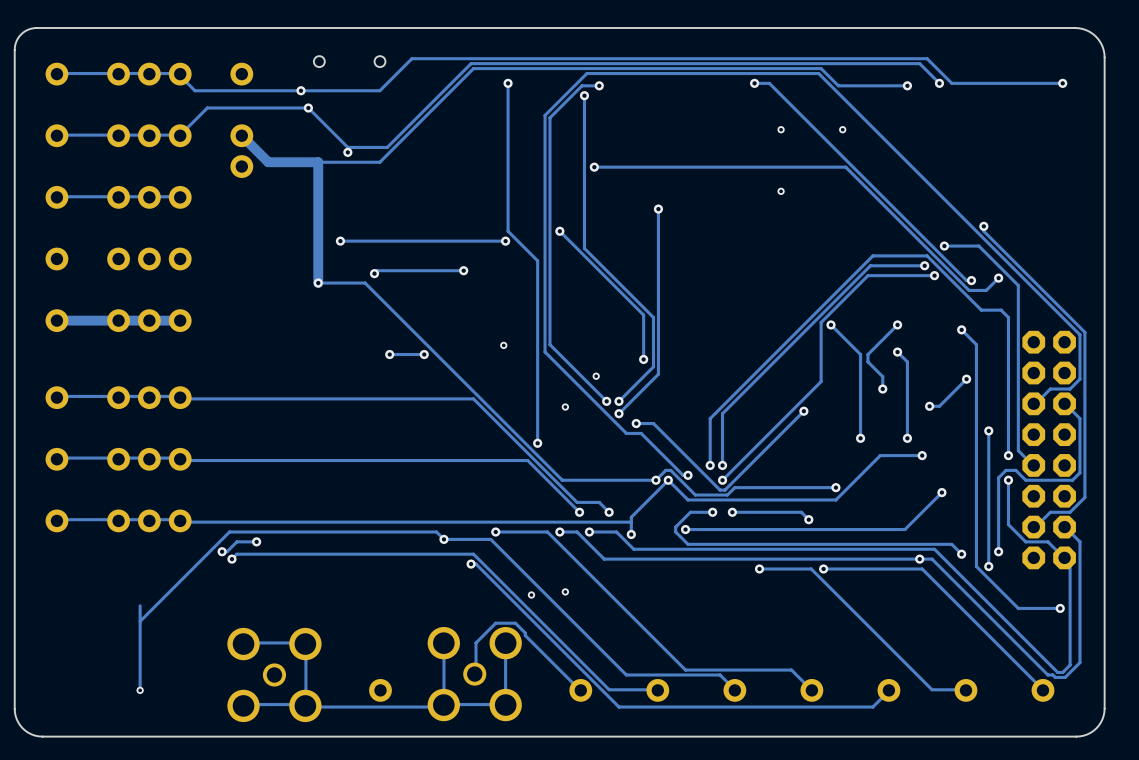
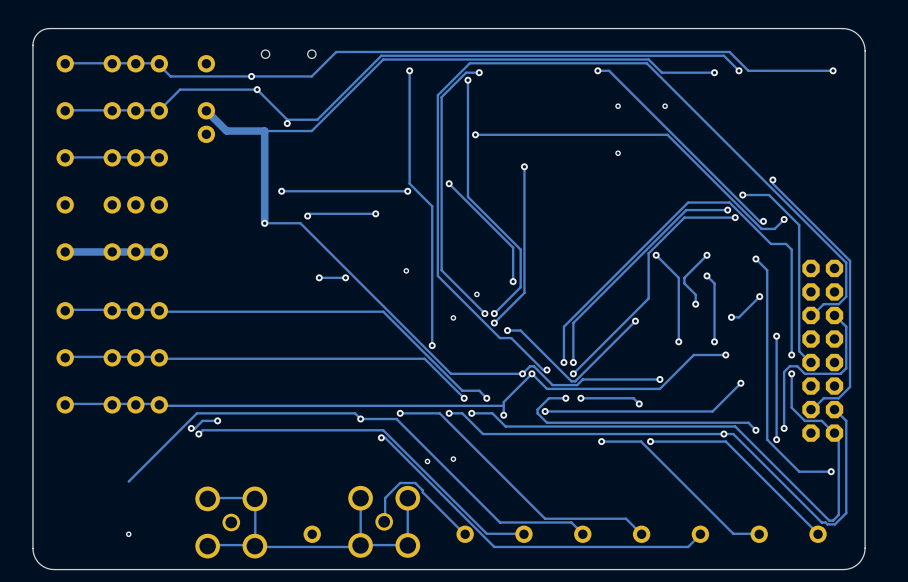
track: (140, 605) (140, 690) -> none

